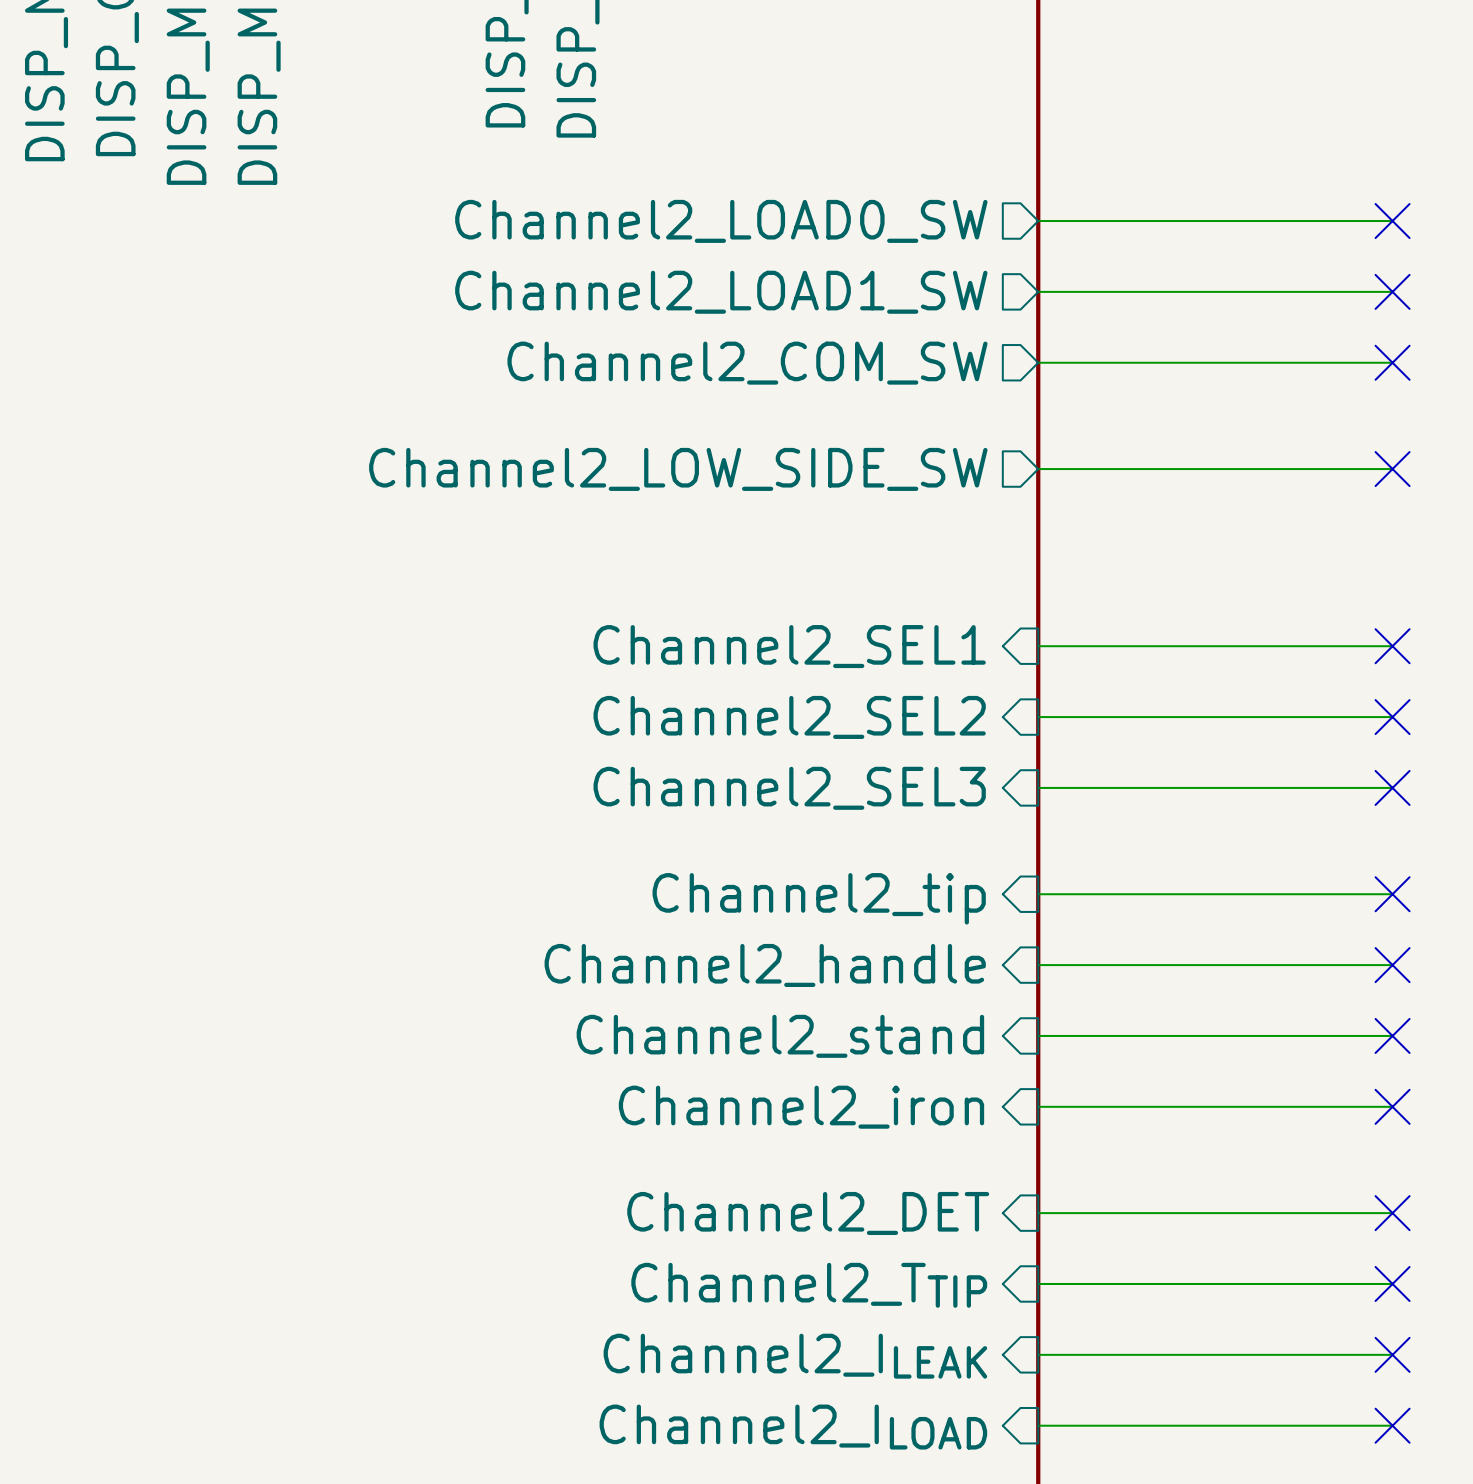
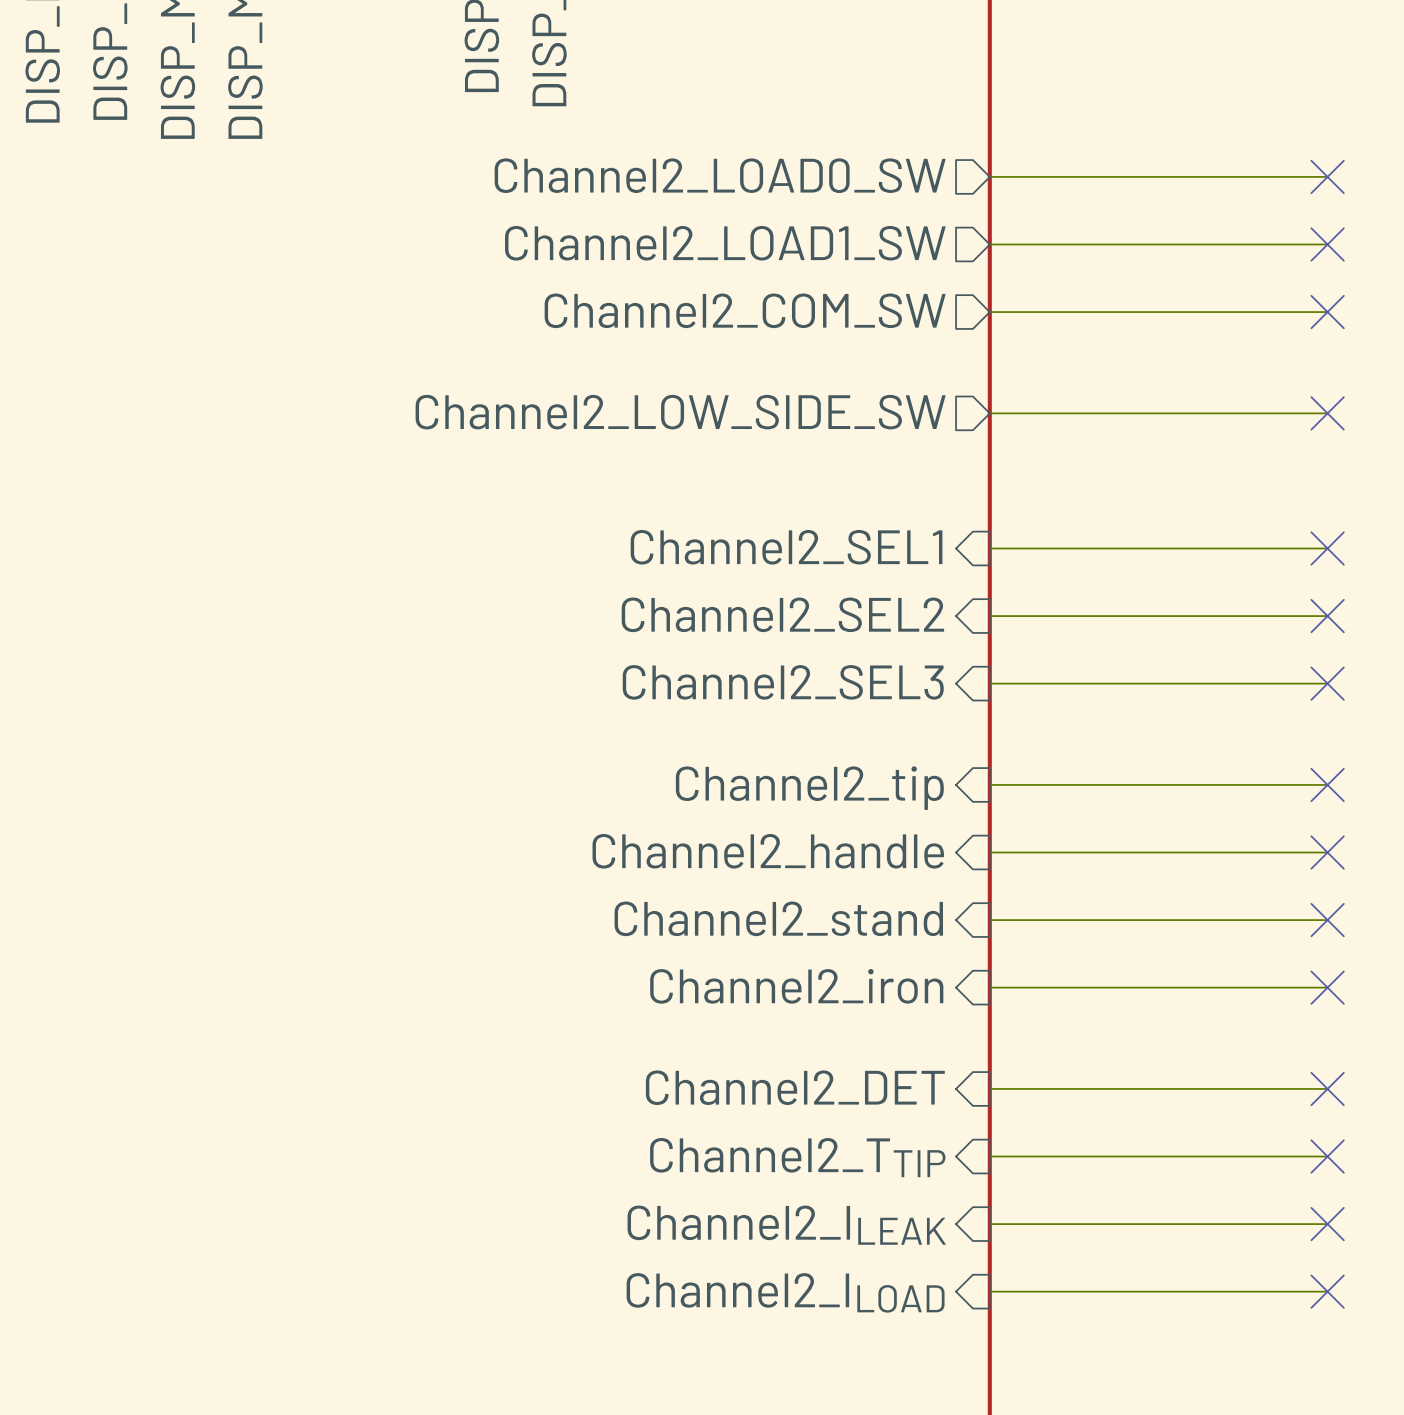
no-connect mark: none -> (1327, 176)
sheet pin position: Channel2_LOAD0_SW (721, 221) -> Channel2_LOAD0_SW (720, 175)
wire: (1038, 221) (1392, 221) -> (989, 176) (1327, 176)
no-connect mark: (1392, 221) -> none
no-connect mark: none -> (1327, 244)
wire: (1038, 291) (1392, 291) -> (989, 244) (1327, 244)
no-connect mark: (1392, 291) -> none
sheet pin position: Channel2_LOAD1_SW (721, 292) -> Channel2_LOAD1_SW (725, 243)
no-connect mark: none -> (1327, 312)
wire: (1038, 362) (1392, 362) -> (989, 312) (1327, 312)
no-connect mark: (1392, 362) -> none
sheet pin position: Channel2_COM_SW (747, 363) -> Channel2_COM_SW (745, 310)
no-connect mark: none -> (1327, 413)
sheet pin position: Channel2_LOW_SIDE_SW (678, 469) -> Channel2_LOW_SIDE_SW (680, 412)
wire: (1038, 469) (1392, 469) -> (989, 413) (1327, 413)
no-connect mark: (1392, 469) -> none
sheet pin: none -> Channel2_SEL1 (786, 547)
wire: none -> (989, 548) (1327, 548)
no-connect mark: none -> (1327, 548)
sheet pin: Channel2_SEL1 (789, 646) -> Channel2_SEL2 (782, 614)
sheet pin: Channel2_SEL2 (789, 717) -> Channel2_SEL3 (783, 682)
wire: (1038, 787) (1392, 787) -> (989, 784) (1327, 784)
no-connect mark position: (1392, 787) -> (1327, 784)
sheet pin: Channel2_SEL3 (789, 788) -> Channel2_tip (809, 788)
sheet pin: Channel2_tip (819, 898) -> Channel2_handle (768, 851)
sheet pin: Channel2_handle (765, 965) -> Channel2_stand (778, 918)
sheet pin: Channel2_stand (780, 1036) -> Channel2_iron (796, 986)
wire: (1038, 1106) (1392, 1106) -> (989, 1088) (1327, 1088)
no-connect mark position: (1392, 1106) -> (1327, 1088)
sheet pin: Channel2_iron (801, 1107) -> Channel2_DET (795, 1087)
sheet pin: Channel2_DET (808, 1213) -> Channel2_TTIP (797, 1157)
sheet pin: Channel2_TTIP (809, 1285) -> Channel2_ILEAK (786, 1225)
sheet pin: Channel2_ILEAK (795, 1356) -> Channel2_ILOAD (785, 1292)
wire: (1038, 1425) (1392, 1425) -> none
no-connect mark: (1392, 1425) -> none
sheet pin: Channel2_ILOAD (793, 1427) -> none

